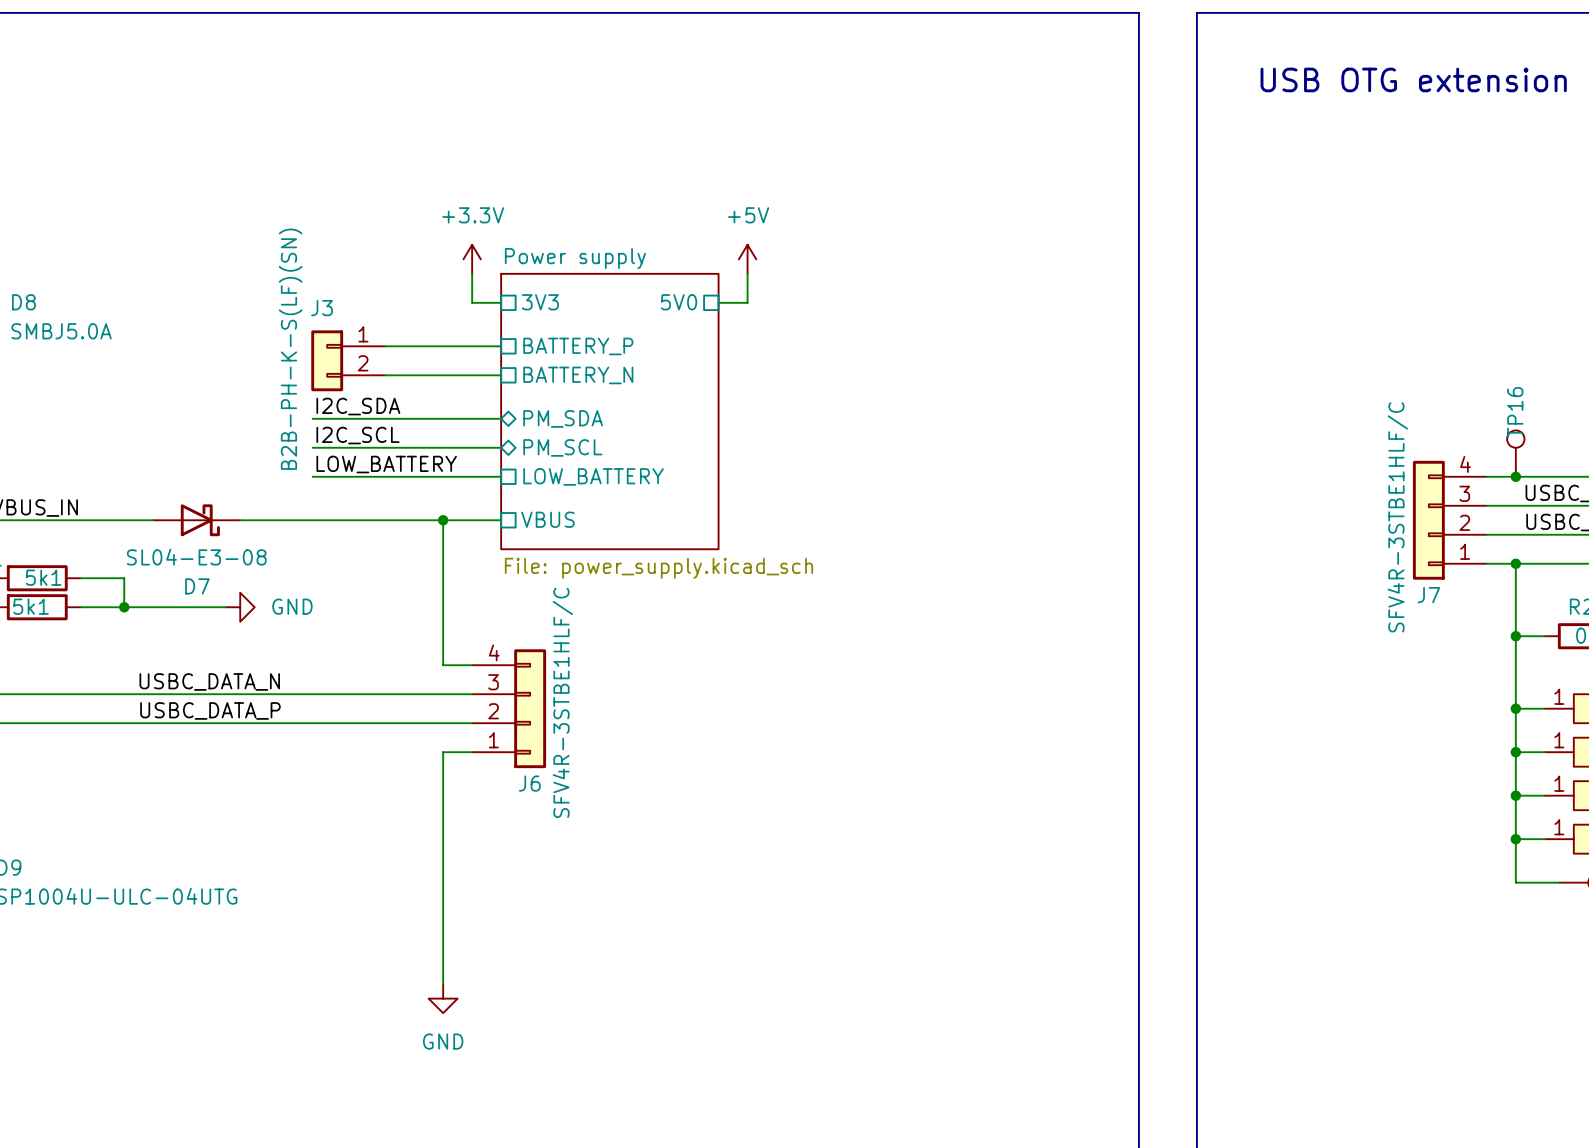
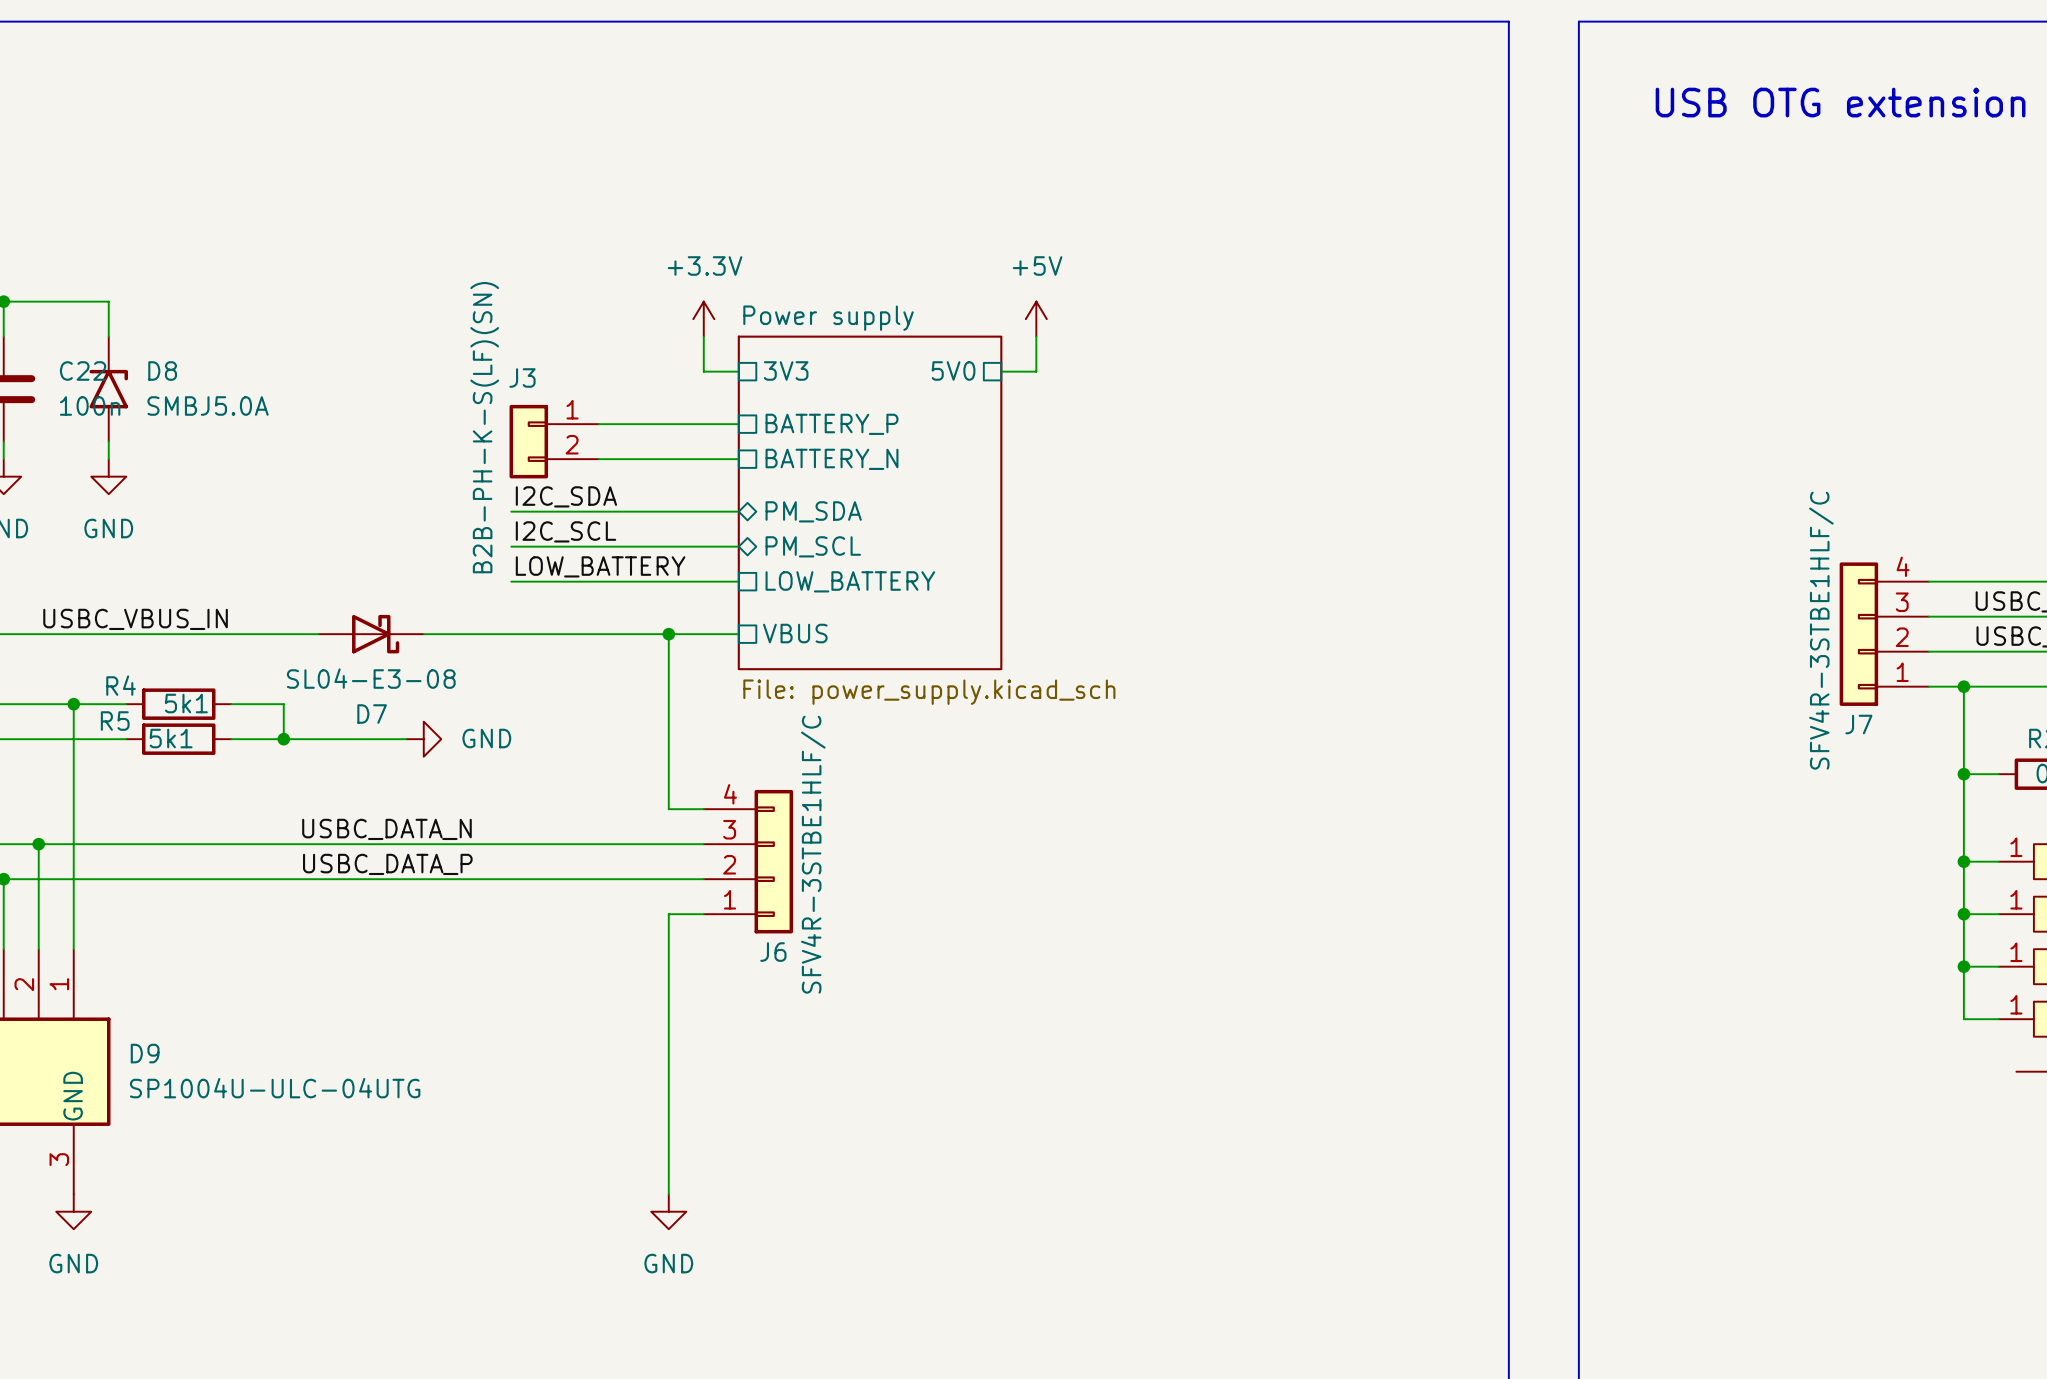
TP16: (1515, 453) -> none
junction: (1515, 476) -> none
wire: (1515, 839) (1515, 882) (1559, 882) -> none
junction: (1515, 839) -> none

